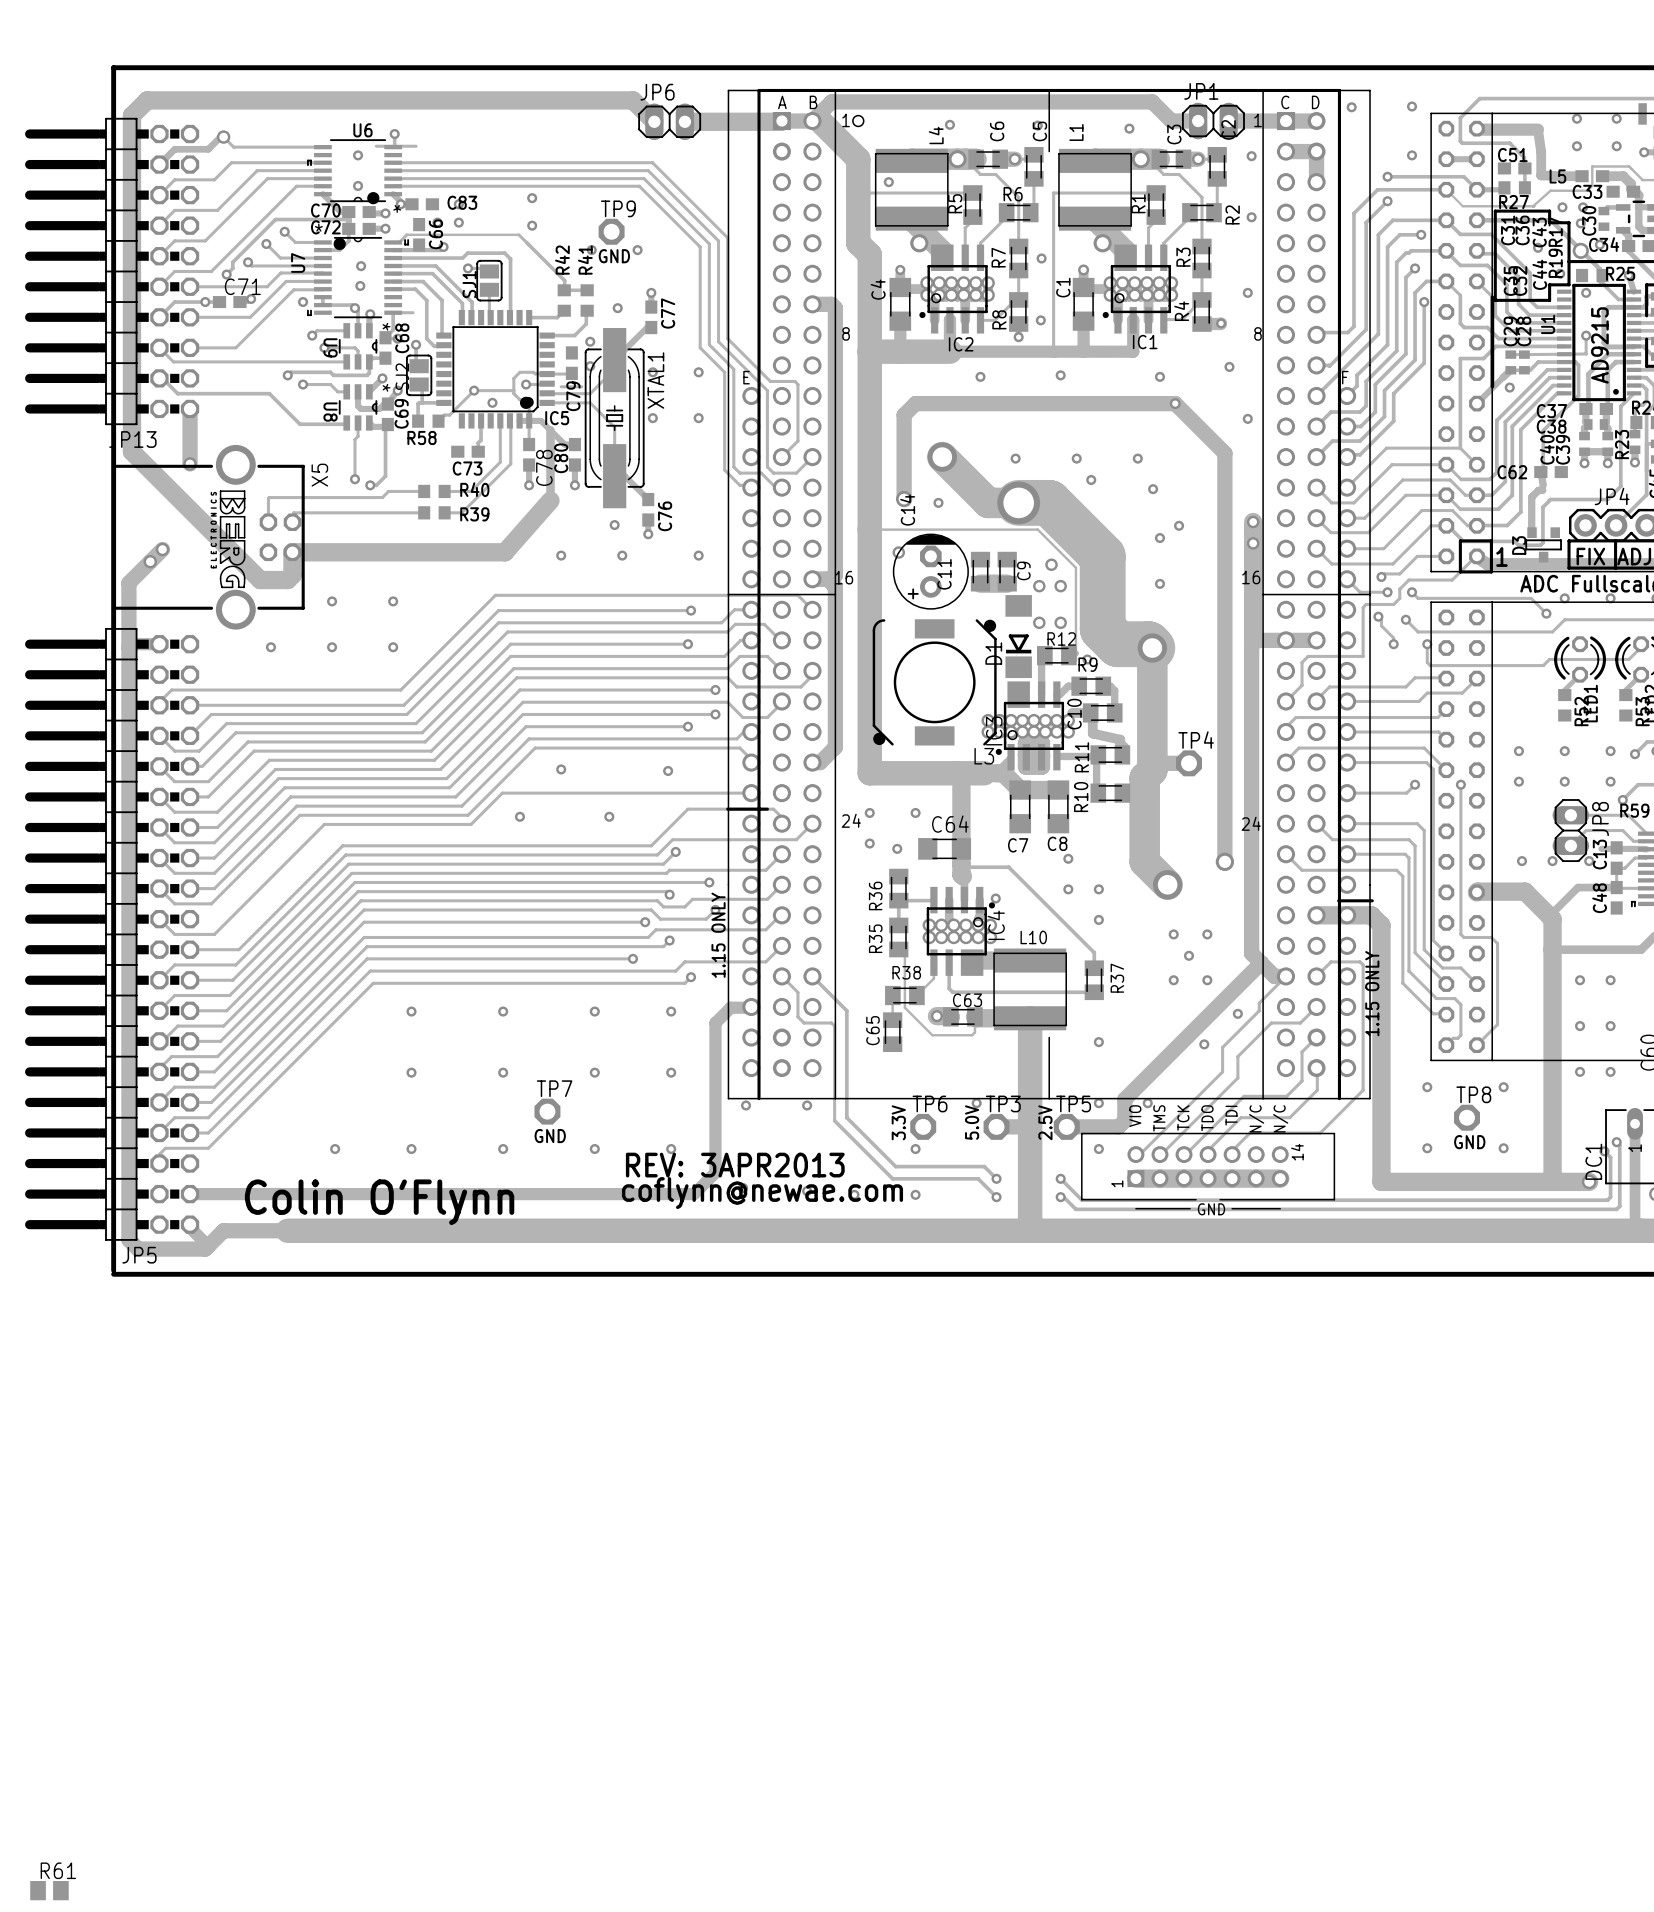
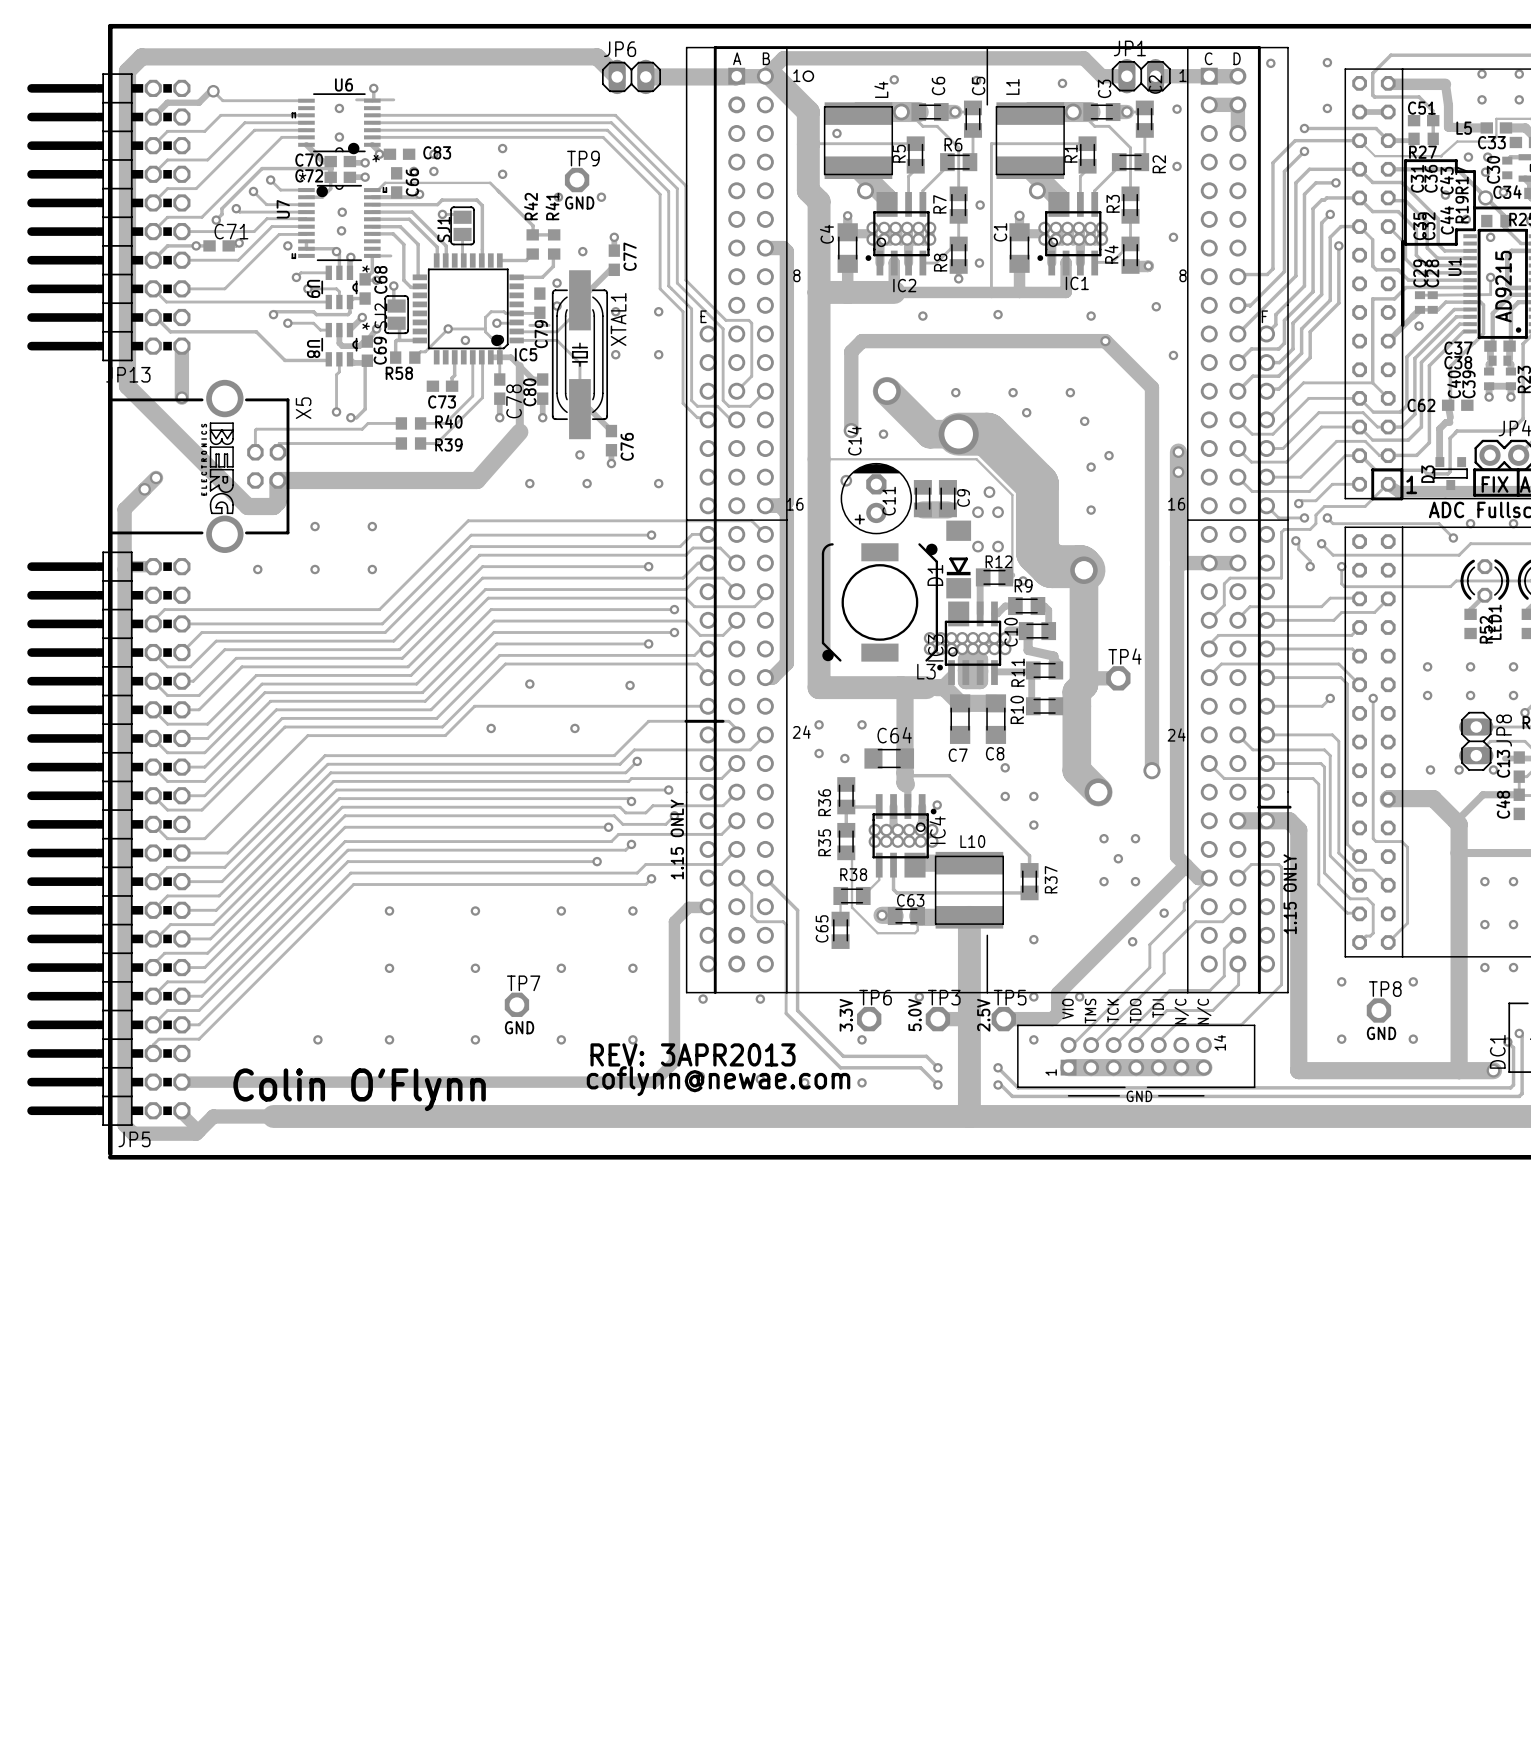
R61: (49, 1890) -> none

